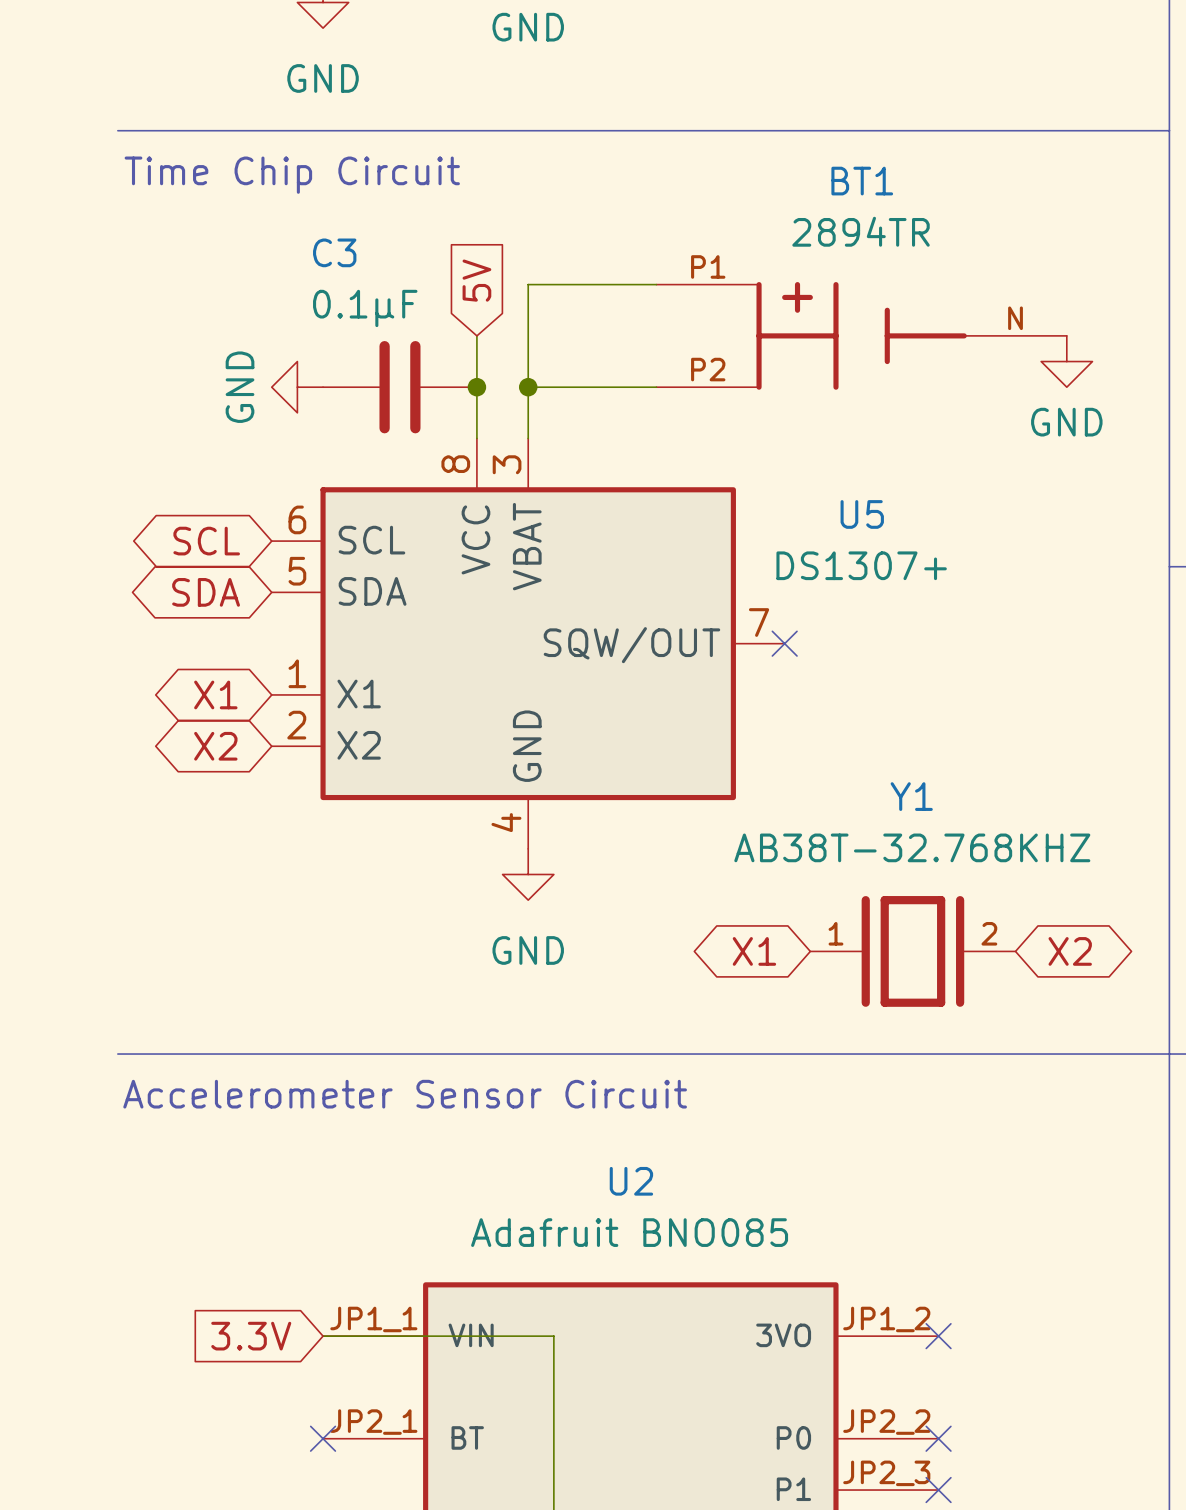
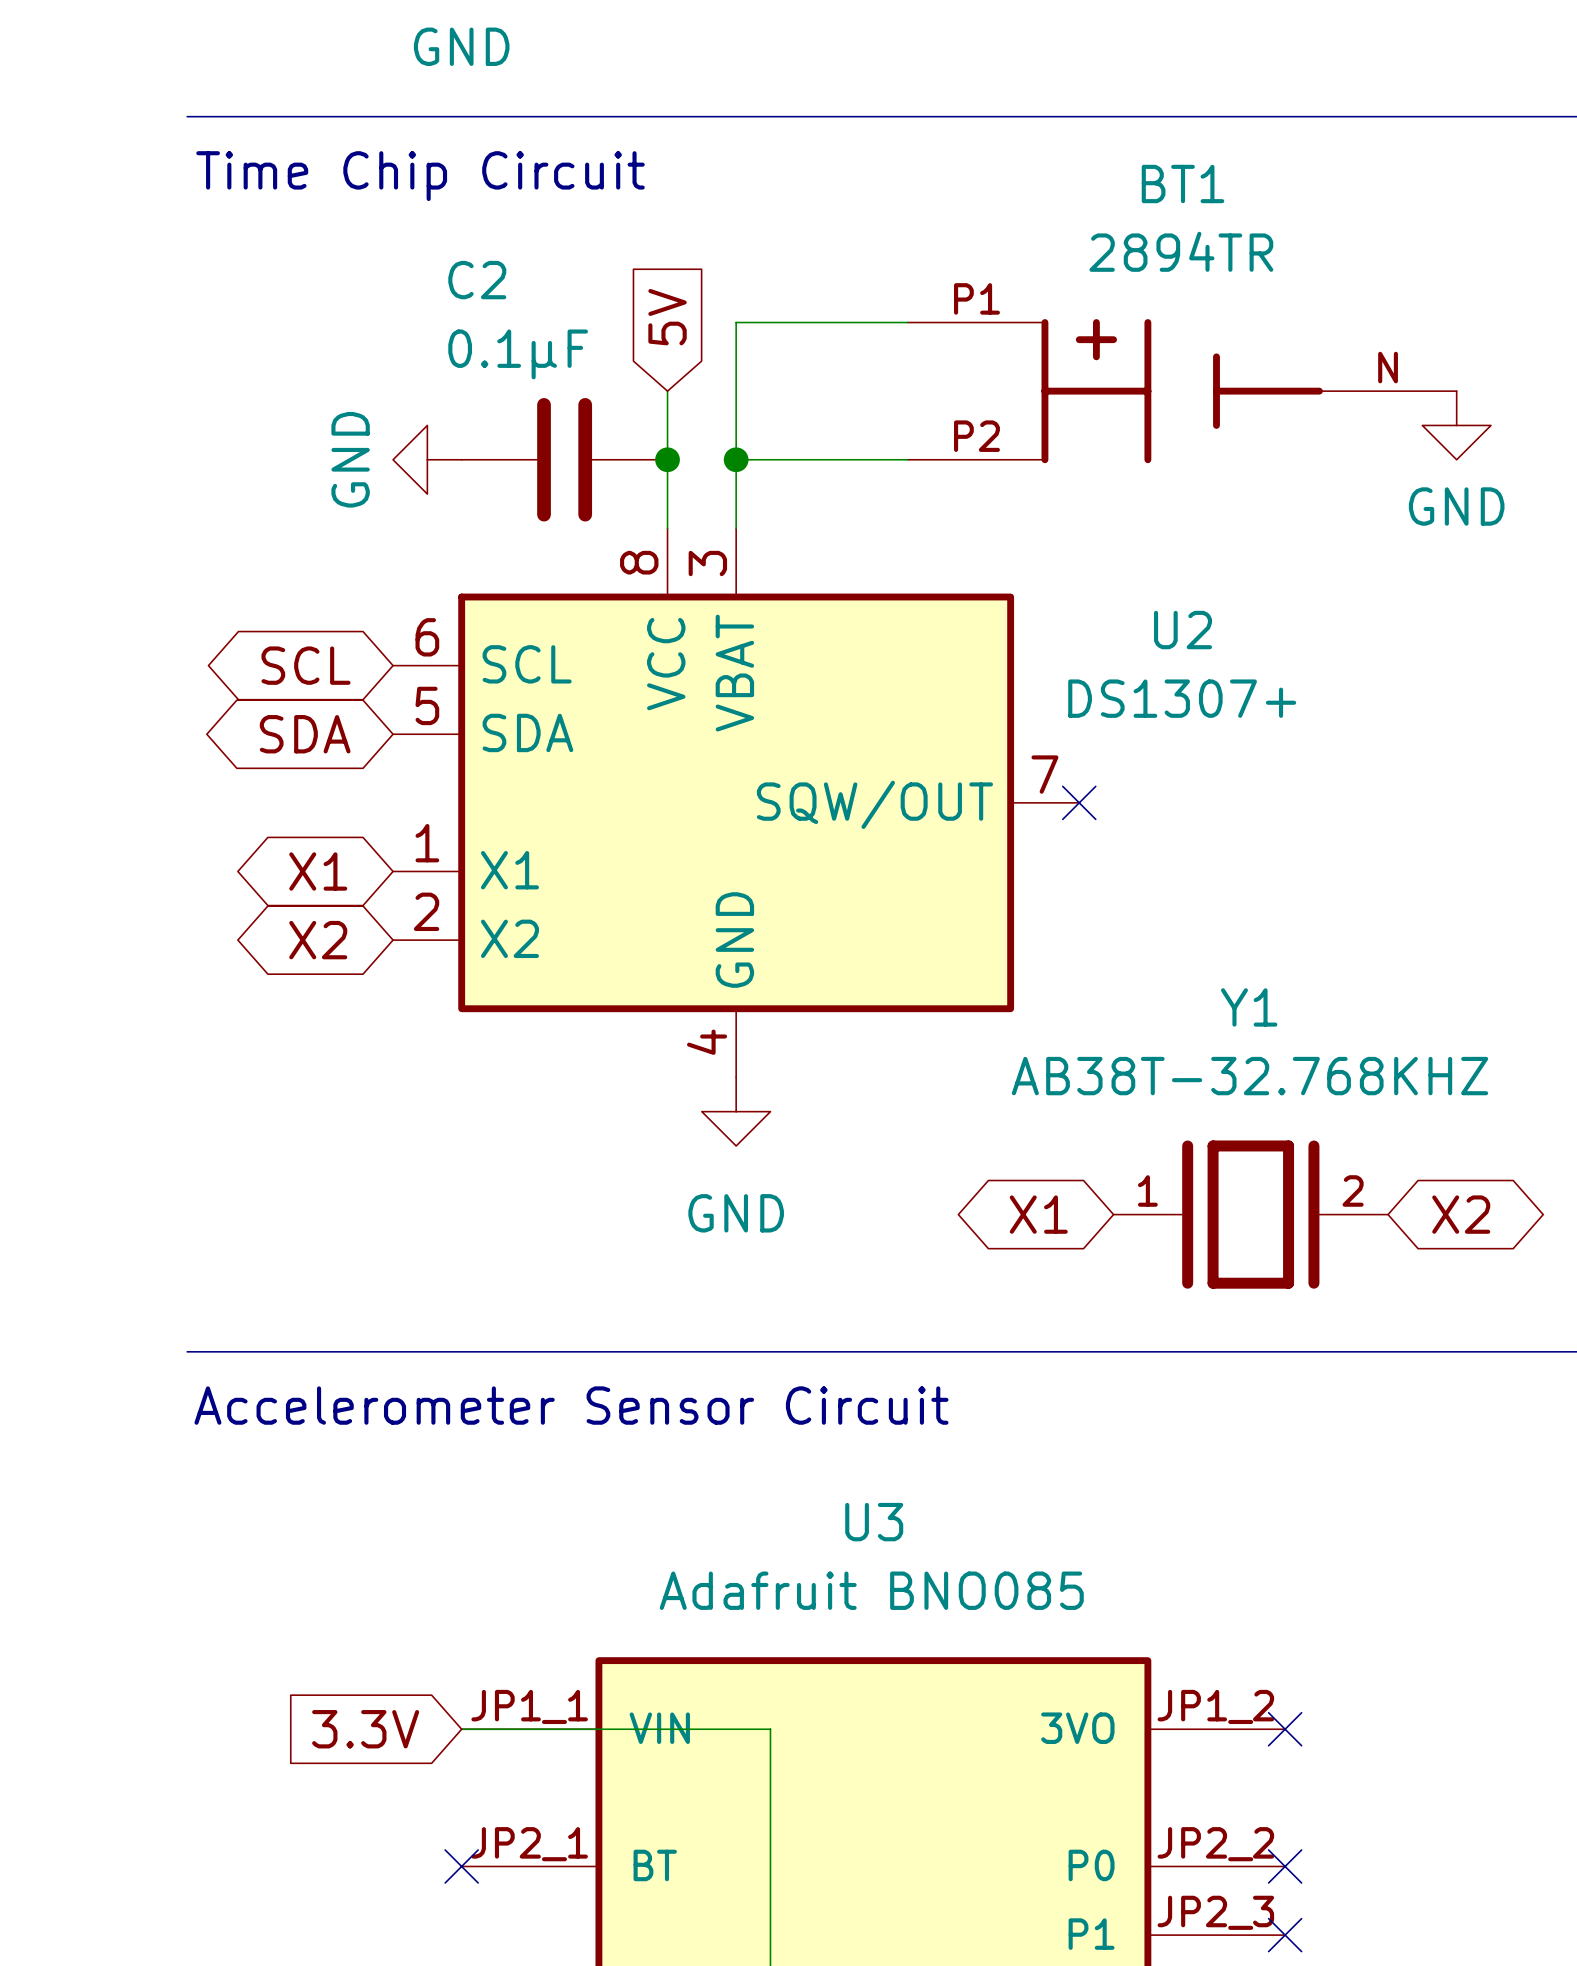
C3 name: C3 (334, 252) -> C2 (477, 280)
U5 name: U5 (862, 514) -> U2 (1183, 630)
U2 name: U2 (631, 1181) -> U3 (874, 1522)

